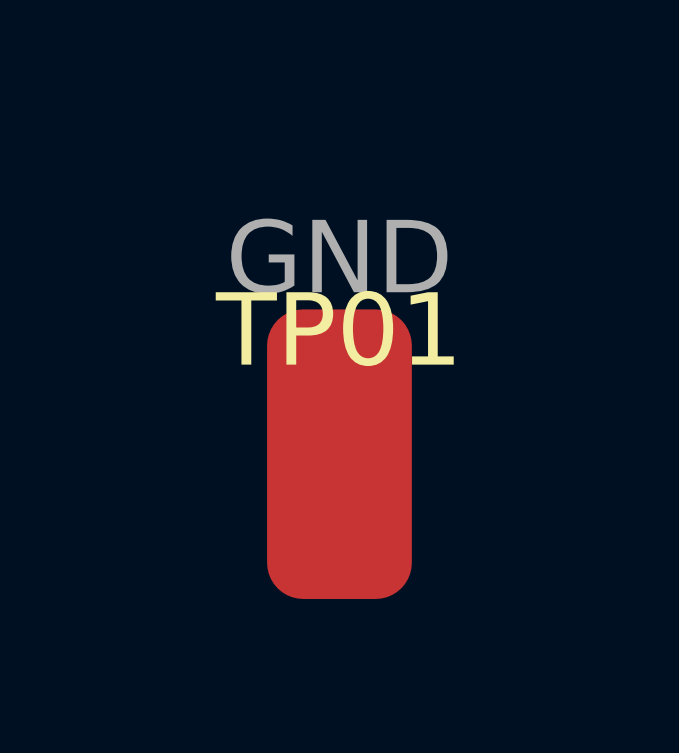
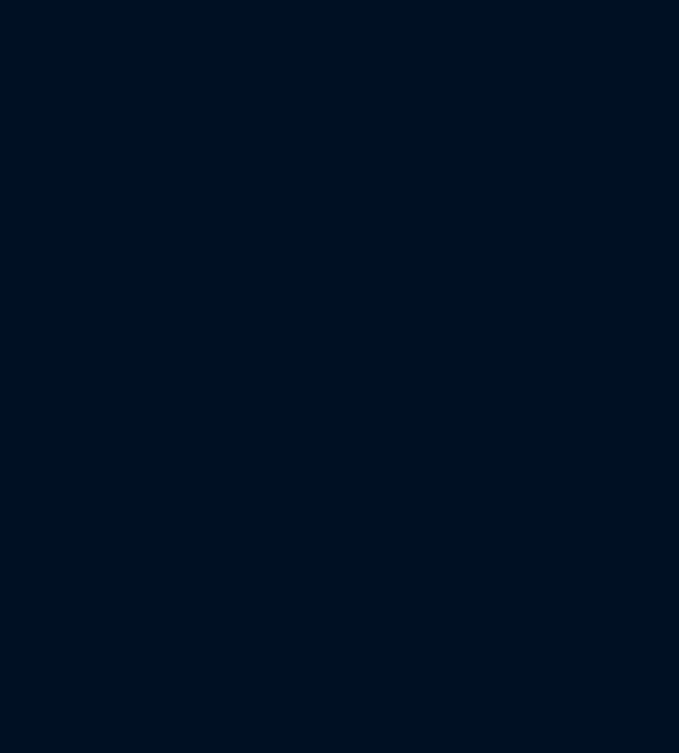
TP01: GND (339, 454) -> none

